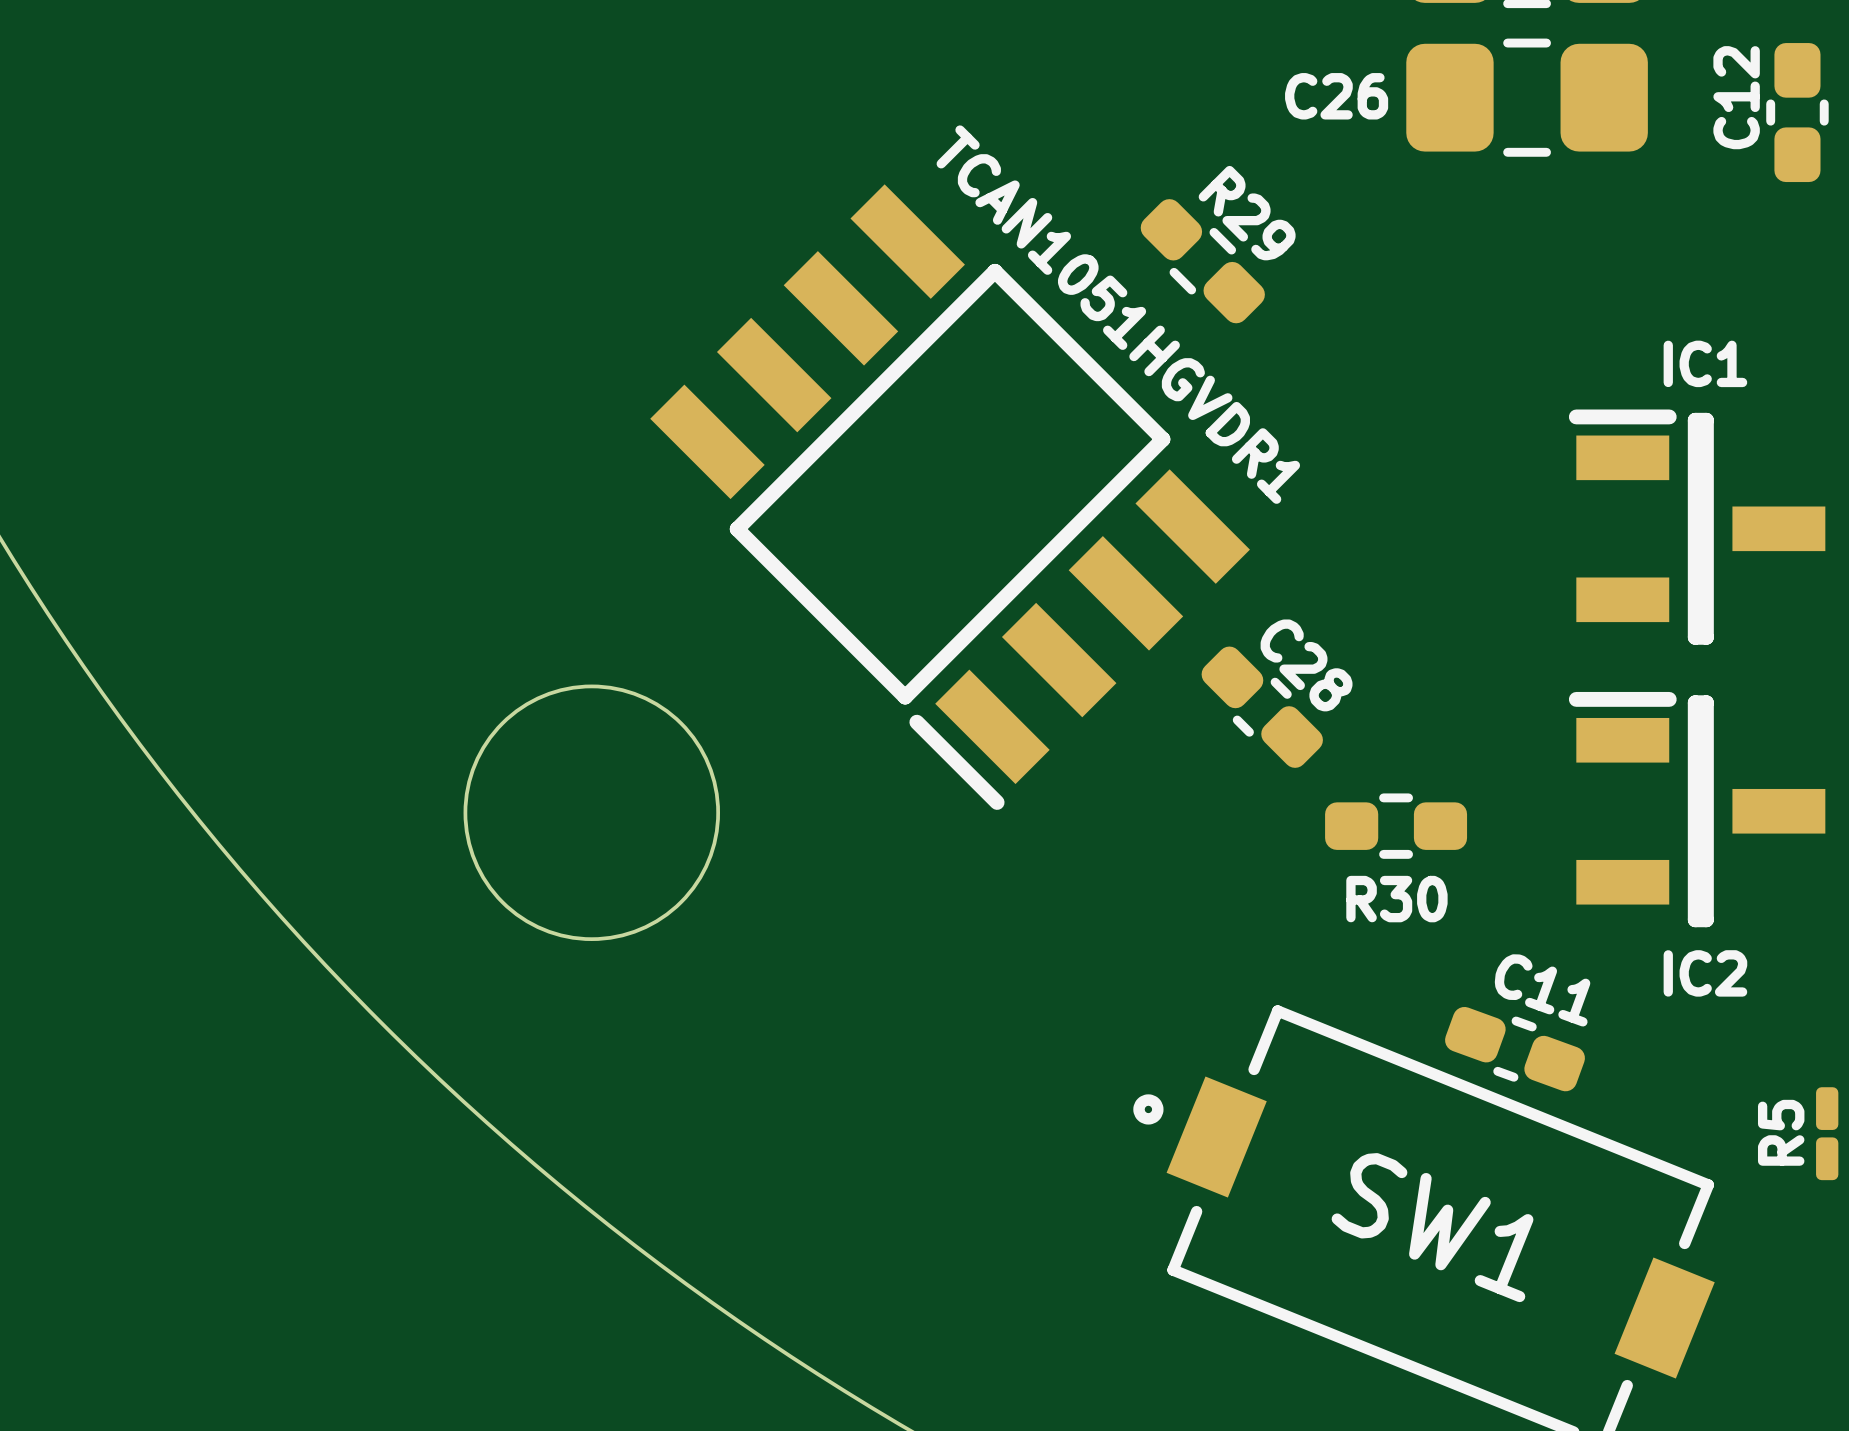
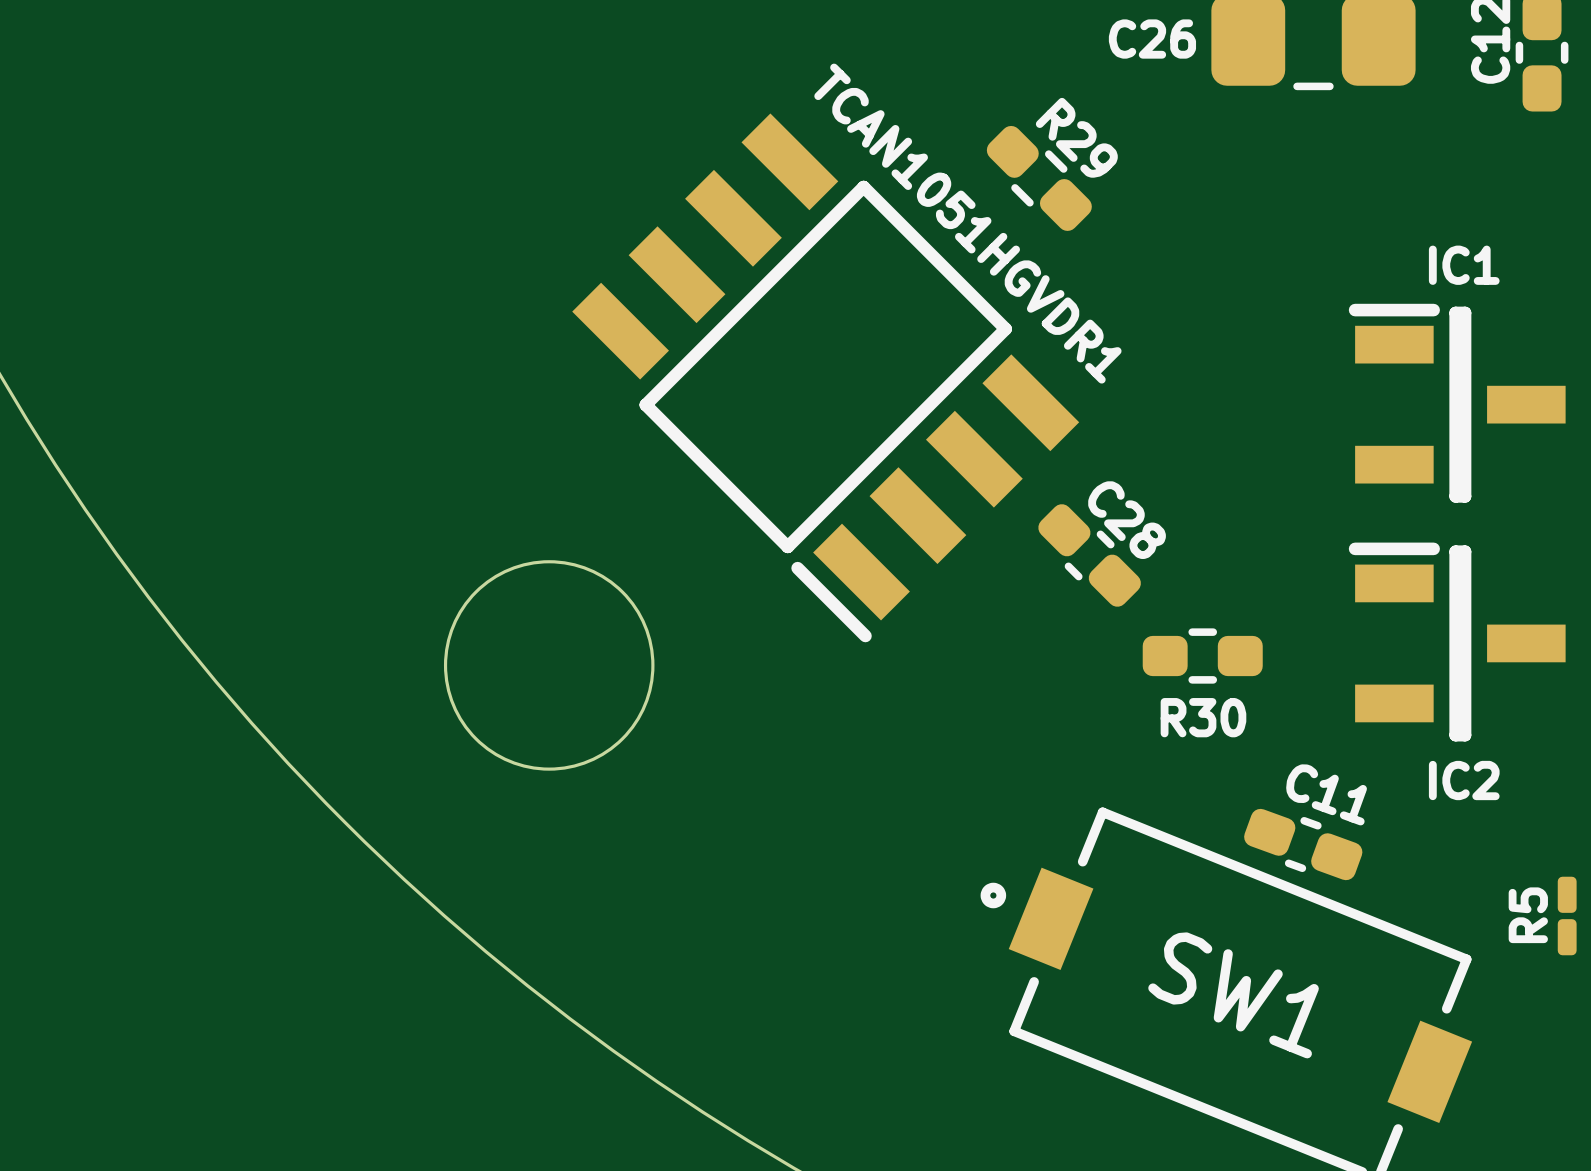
round board edge position: (591, 812) -> (549, 665)

